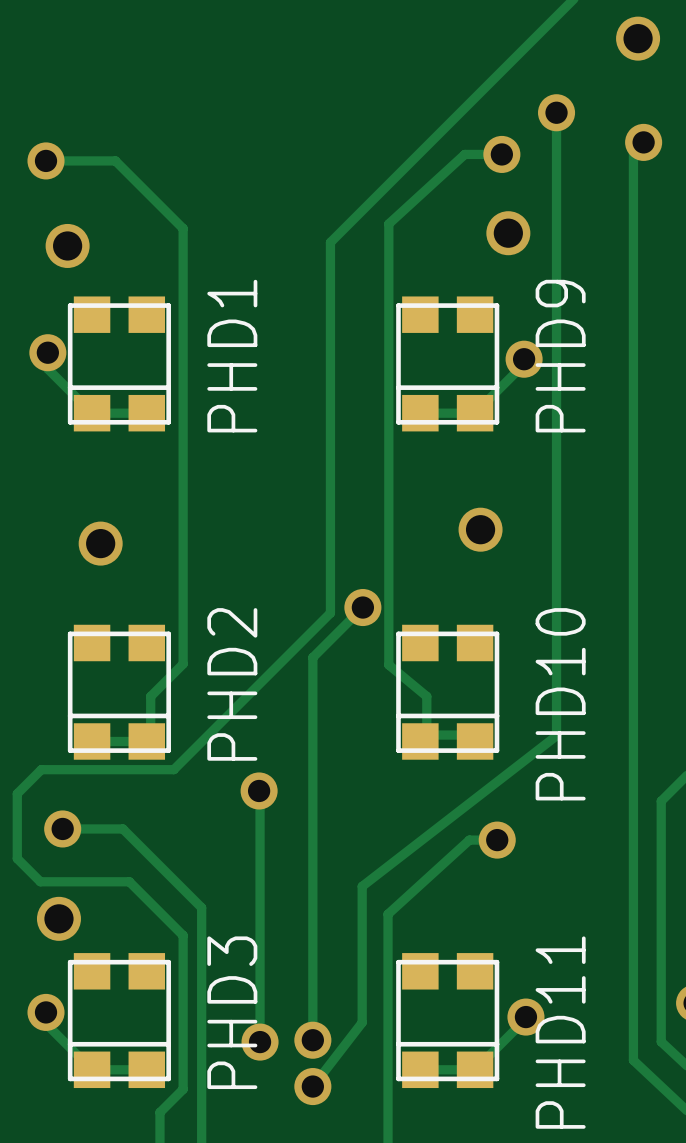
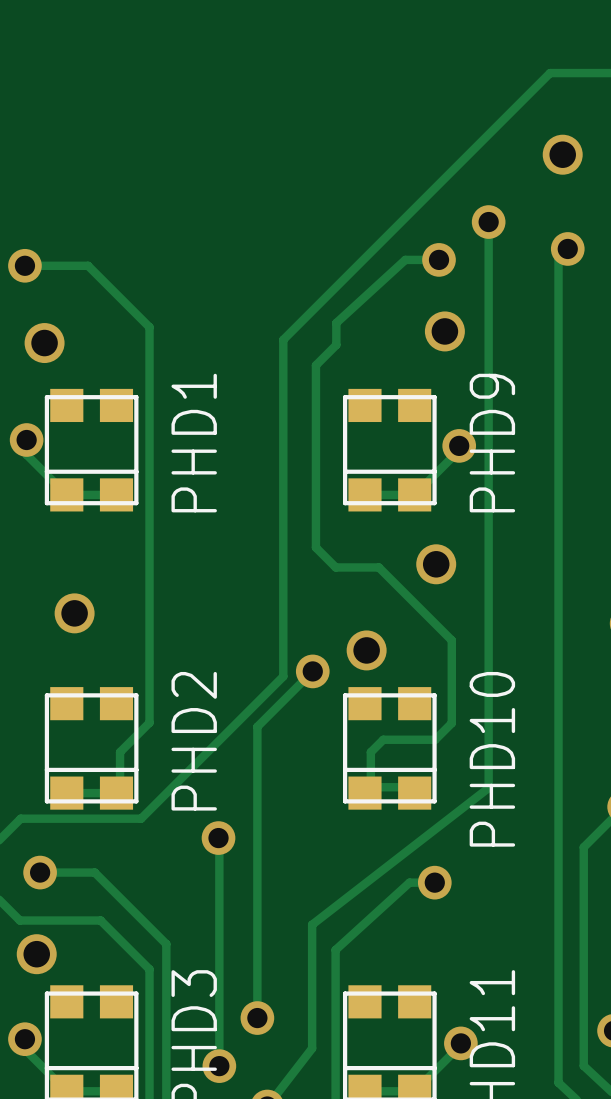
track: (388, 248) (388, 664) (426, 696) -> (336, 344) (315, 365) (315, 547) (335, 567) (378, 567) (451, 640) (451, 723) (435, 739) (383, 739) (370, 752)
via: none -> (436, 564)
via: (480, 529) -> none
via: none -> (366, 650)
track: (312, 657) (312, 1040) -> (267, 716) (257, 726) (257, 1018)
via position: (312, 1040) -> (257, 1018)

